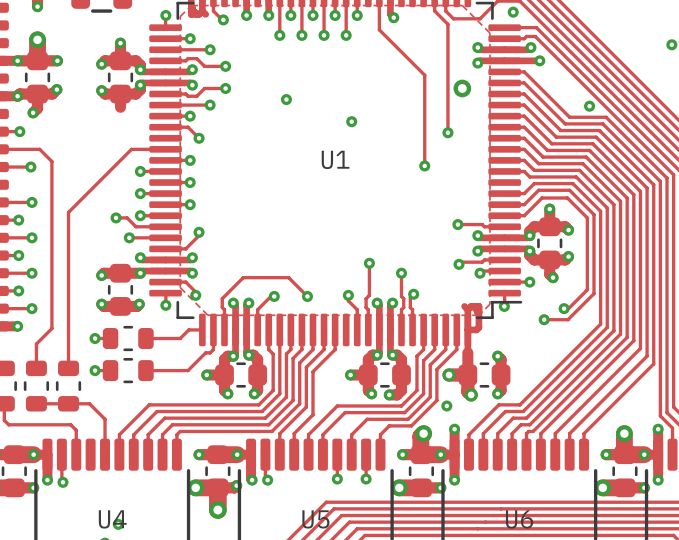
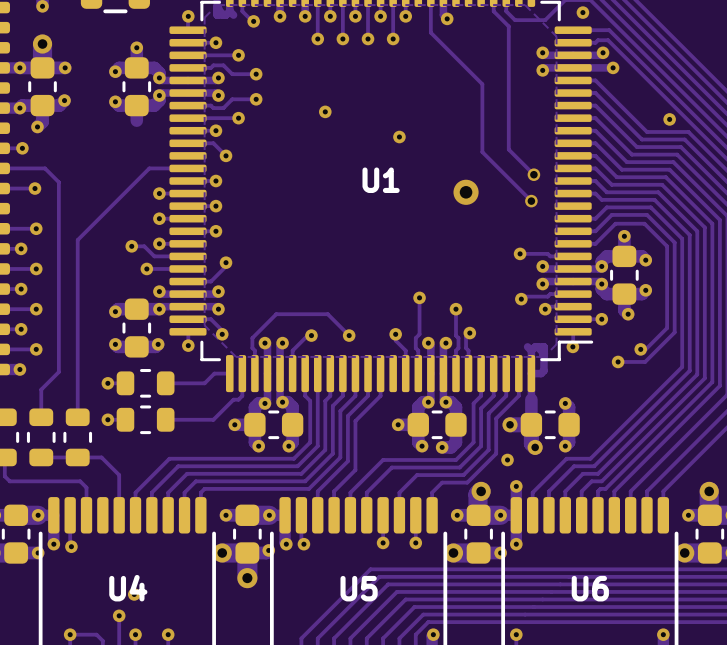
via: (462, 88) -> none
track: none -> (508, 149) (533, 174)
via: (447, 132) -> none
track: (424, 134) (424, 165) -> (482, 152) (531, 201)
via: none -> (533, 174)
via size: [419, 160, 431, 172] -> [453, 179, 479, 205]
via: none -> (531, 201)

